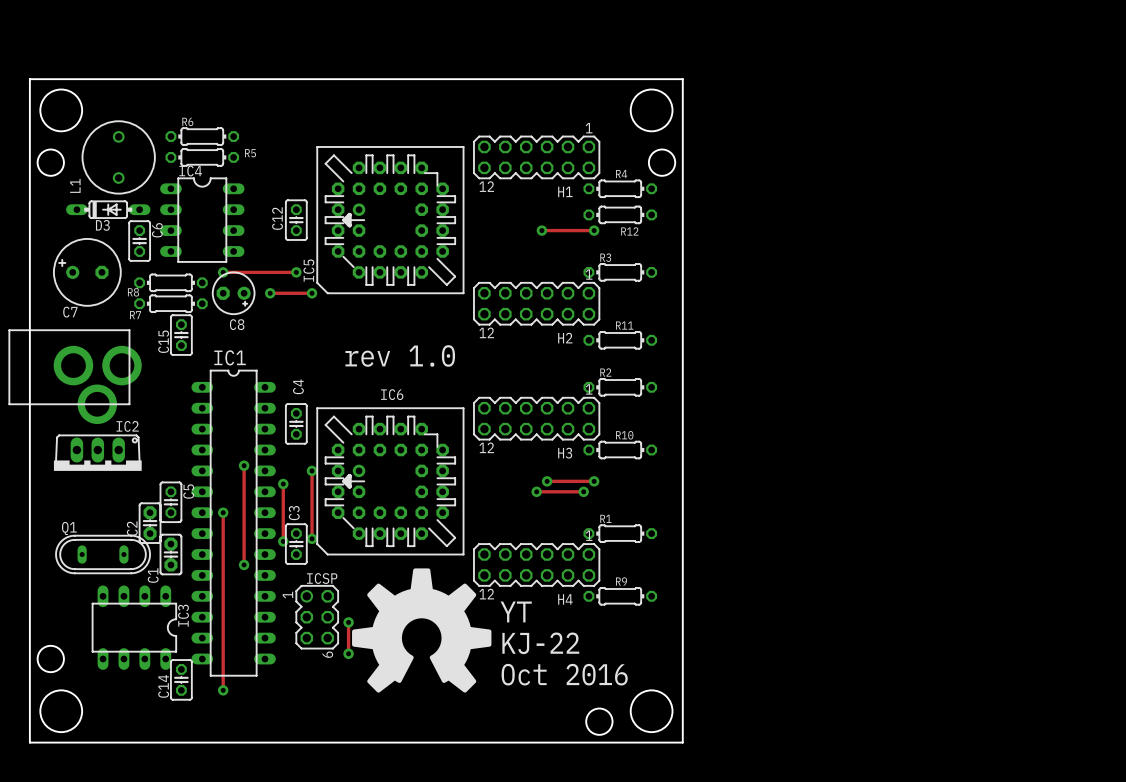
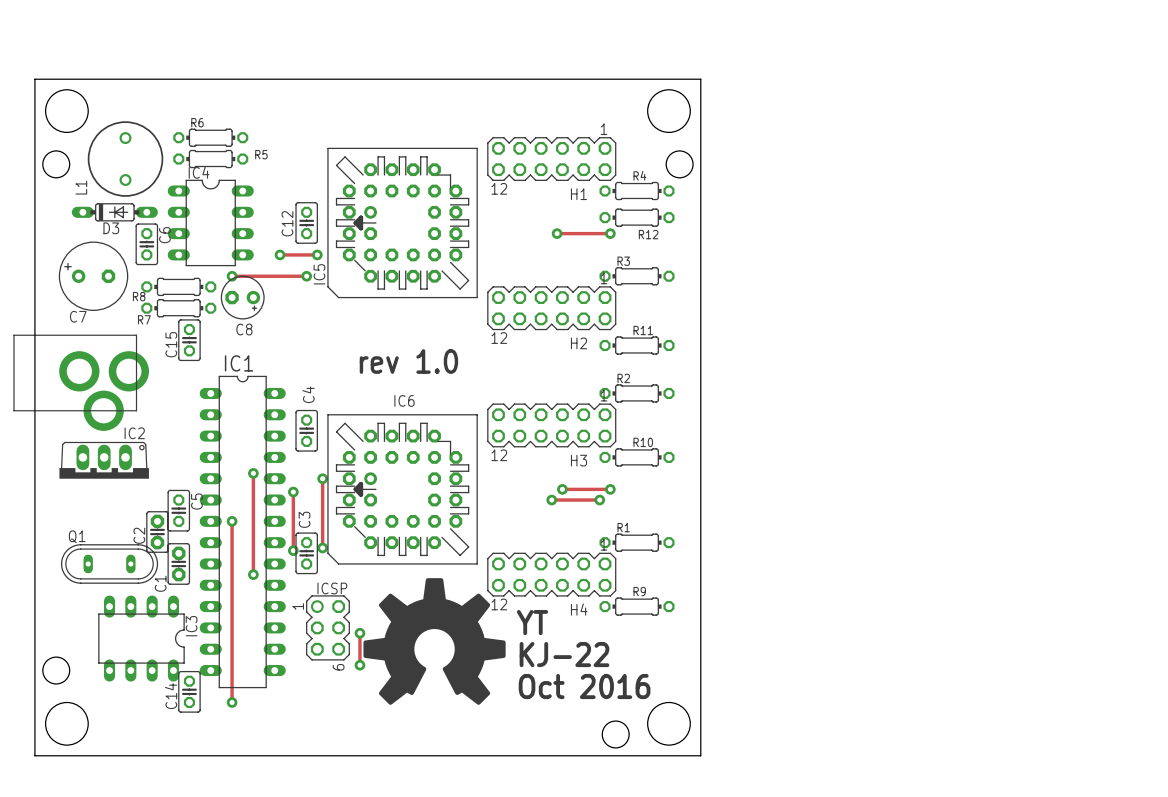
track: none -> (280, 254) (317, 254)
via: none -> (280, 254)
via: none -> (317, 254)
track: (270, 293) (312, 293) -> none
via: (270, 293) -> none
via: (312, 293) -> none

